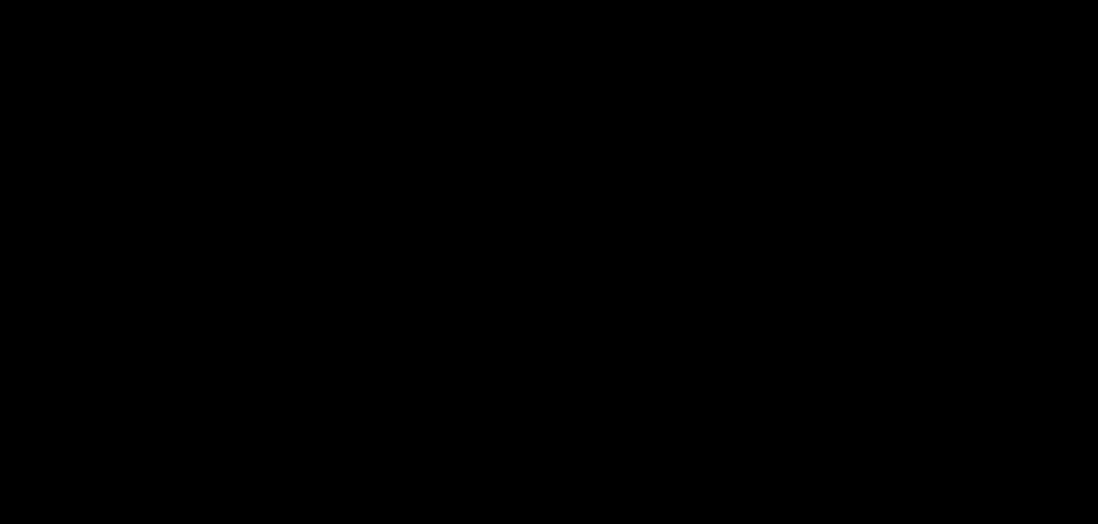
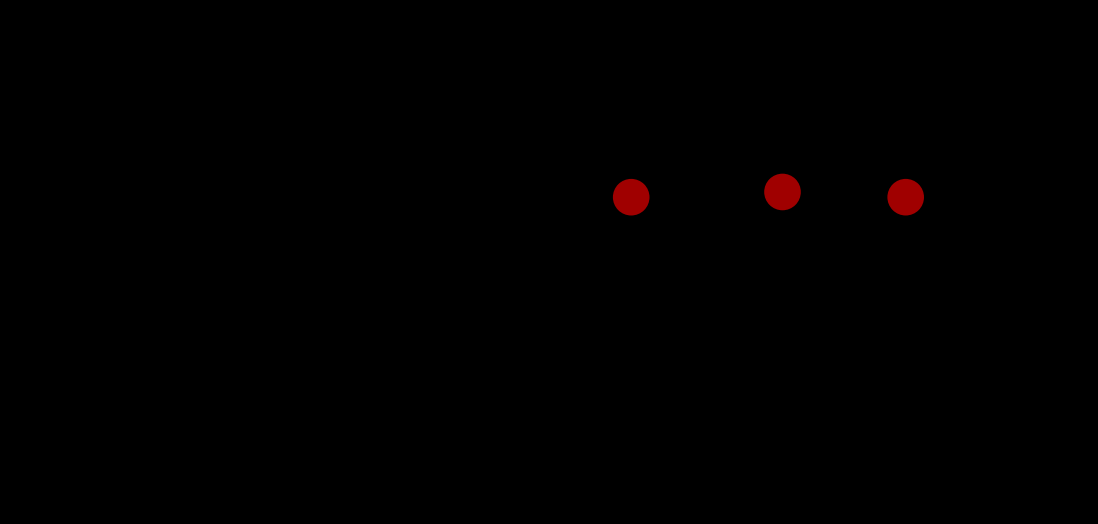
part: none -> (782, 191)
part: none -> (631, 197)
part: none -> (905, 197)

